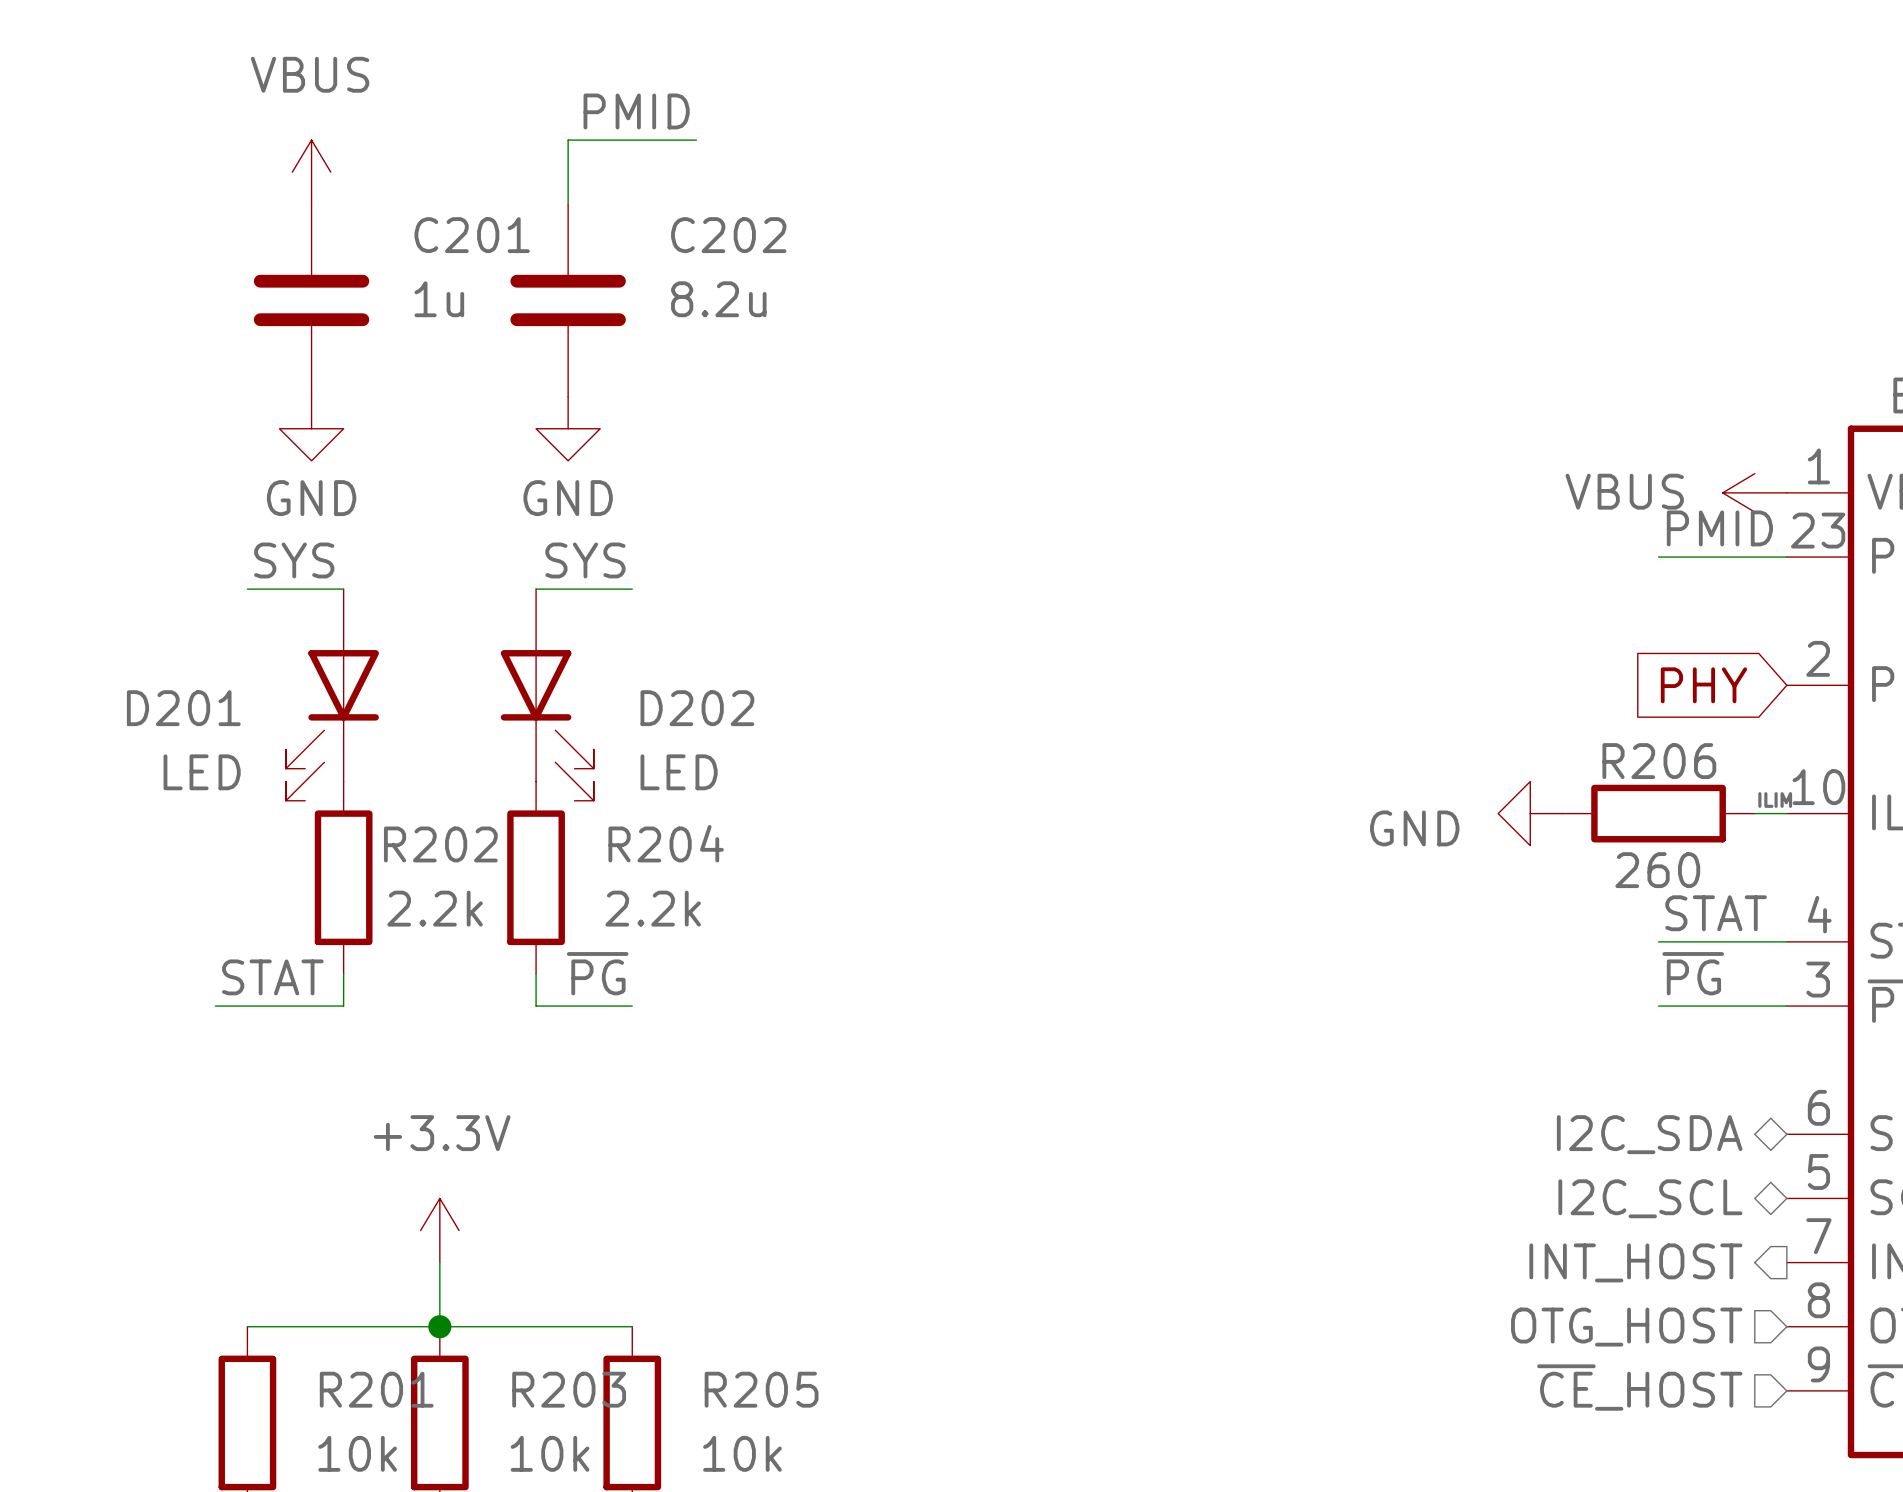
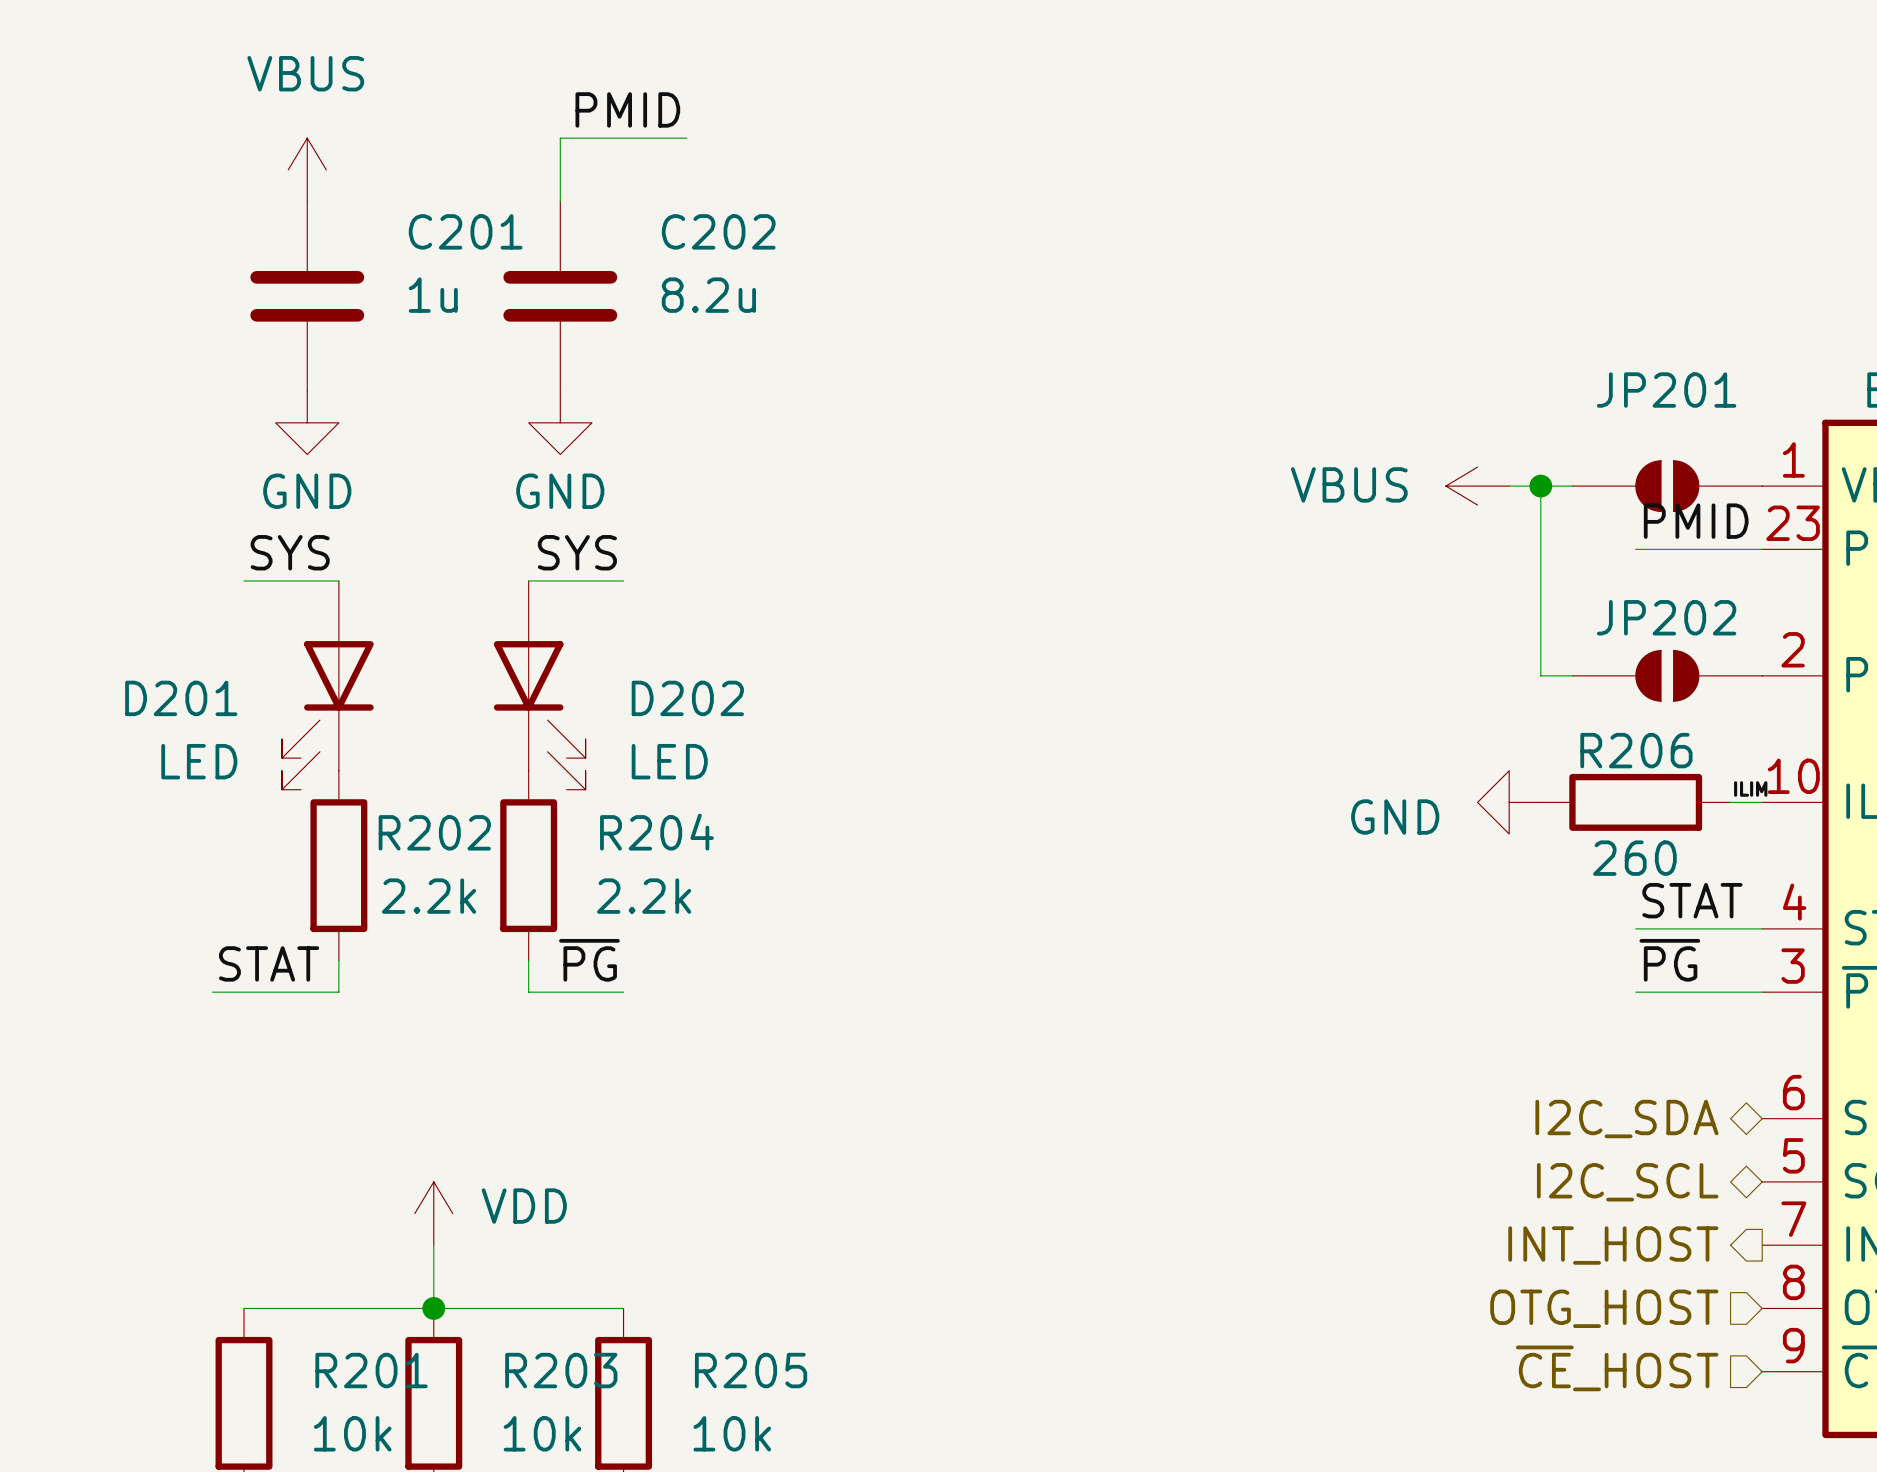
wire: none -> (1509, 486) (1572, 486)
wire: none -> (1540, 486) (1540, 675) (1572, 675)
junction: none -> (1540, 486)
JP201: none -> (1667, 486)
power symbol position: VBUS (1754, 492) -> VBUS (1477, 486)
JP202: none -> (1667, 675)
global label: PHY (1703, 685) -> none
power symbol: +3.3V (439, 1230) -> VDD (433, 1213)

